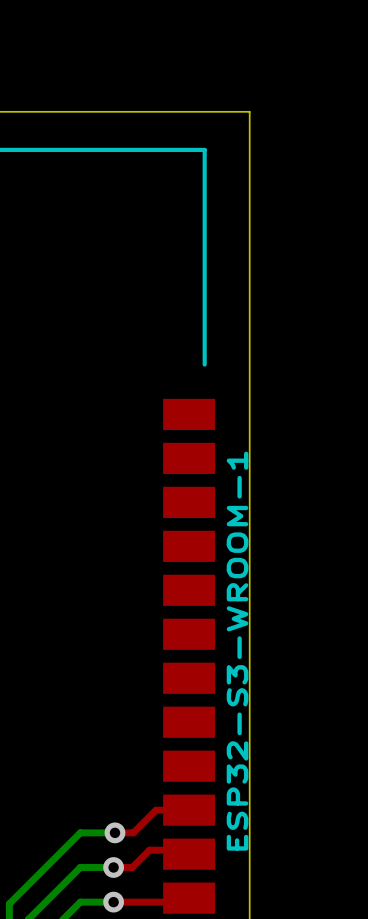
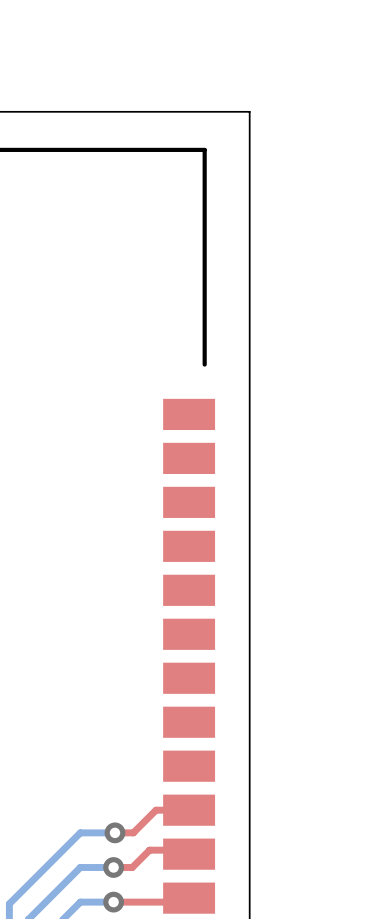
text: ESP32-S3-WROOM-1 (237, 651) -> none

